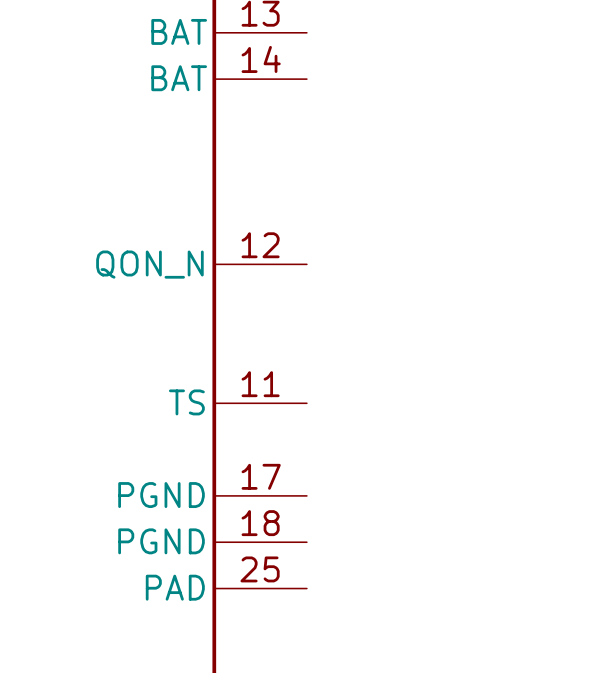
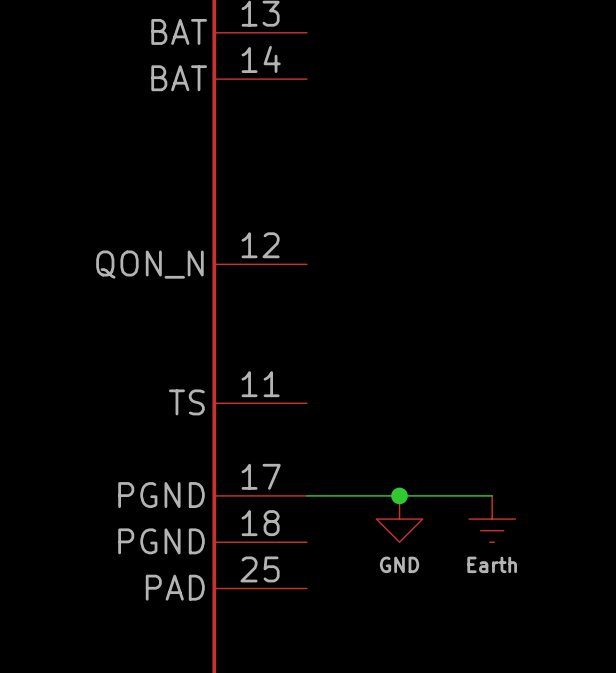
wire: none -> (306, 495) (492, 495)
junction: none -> (399, 495)
power symbol: none -> GND (399, 519)
power symbol: none -> Earth (492, 519)

